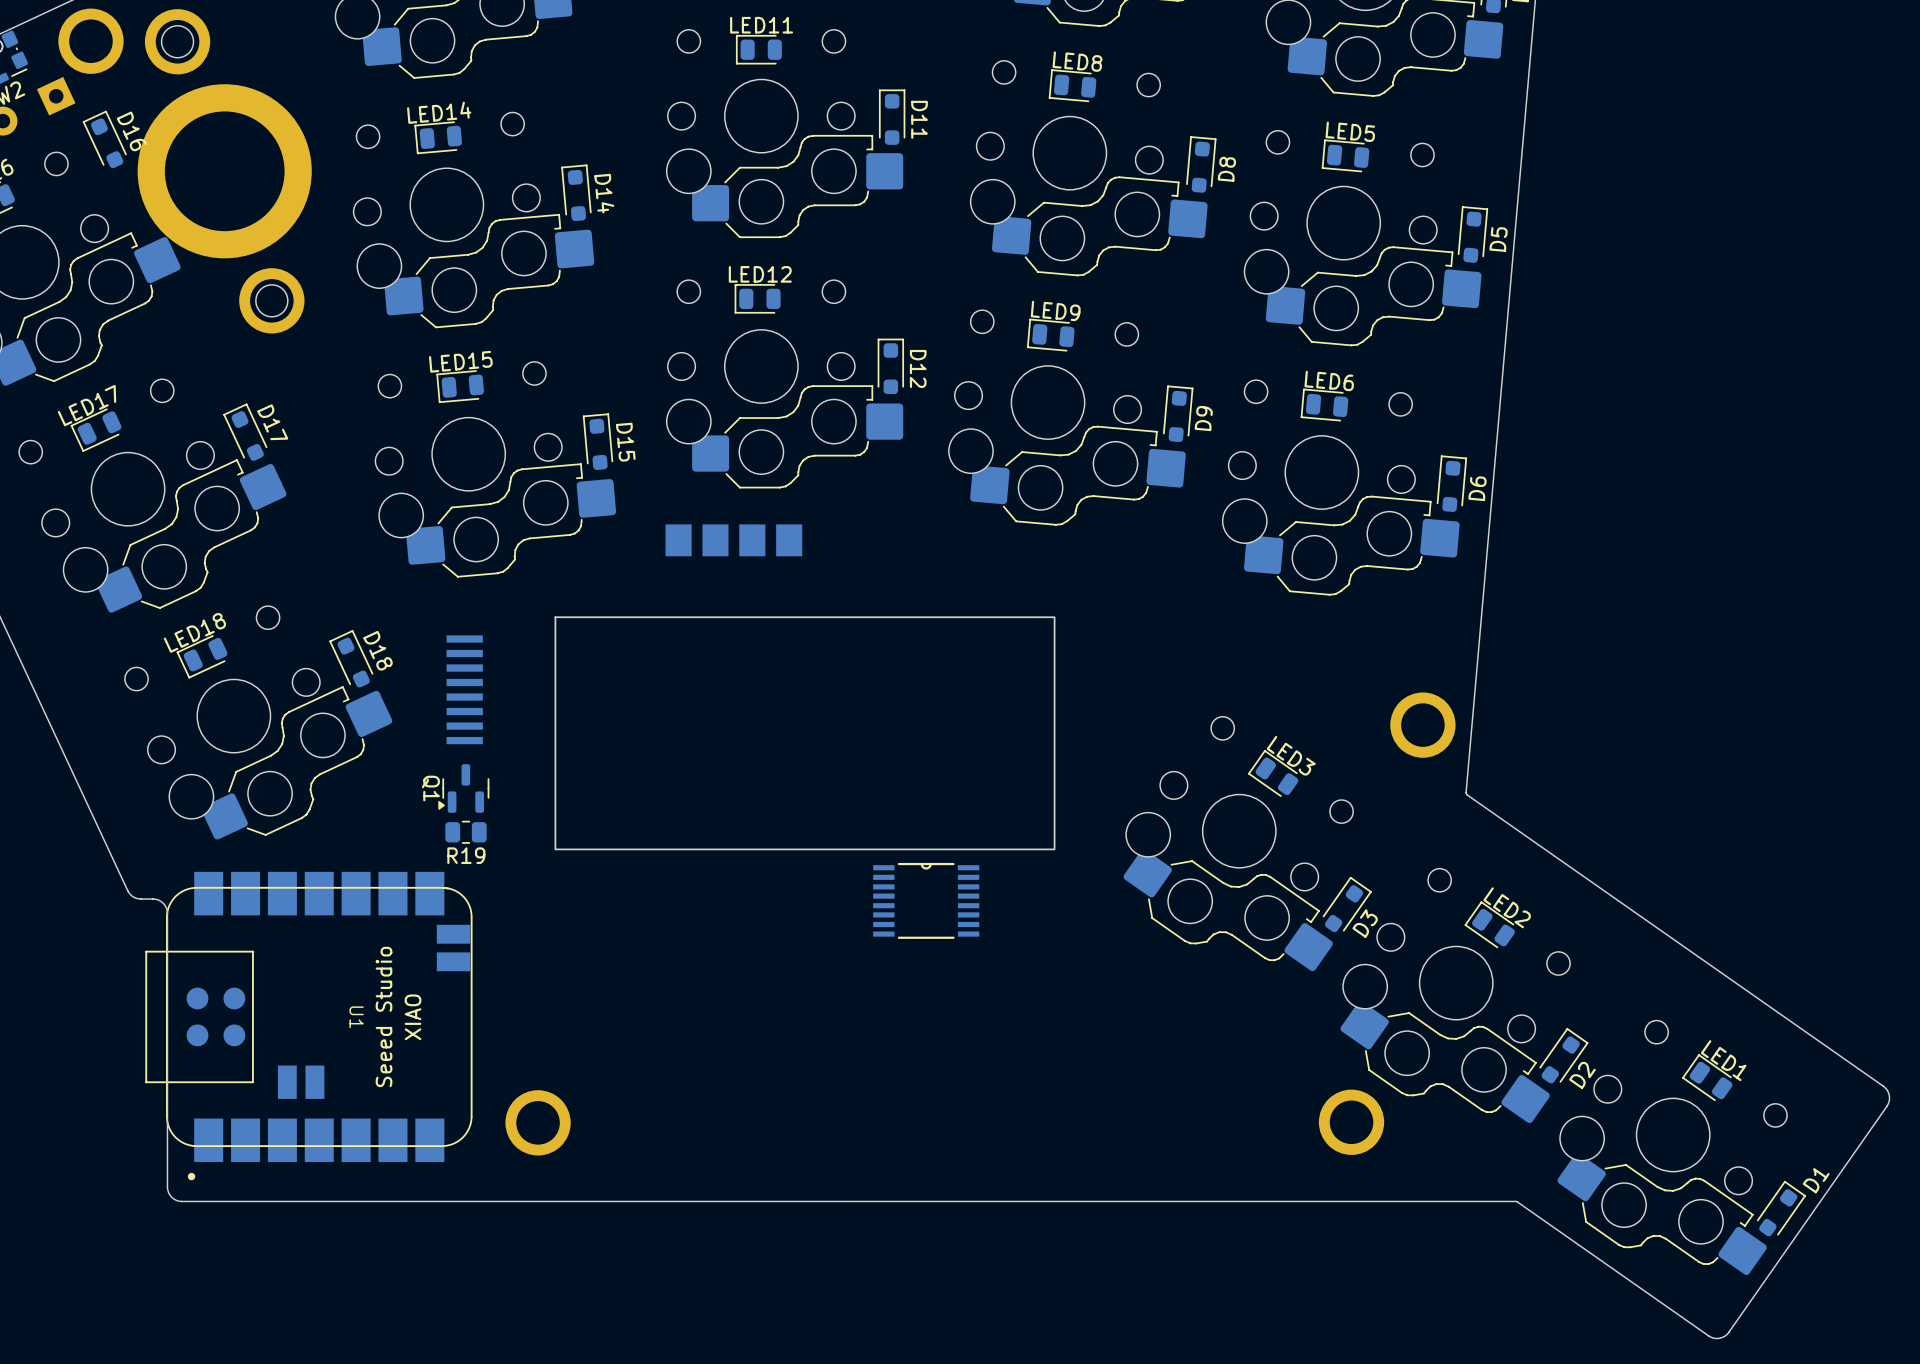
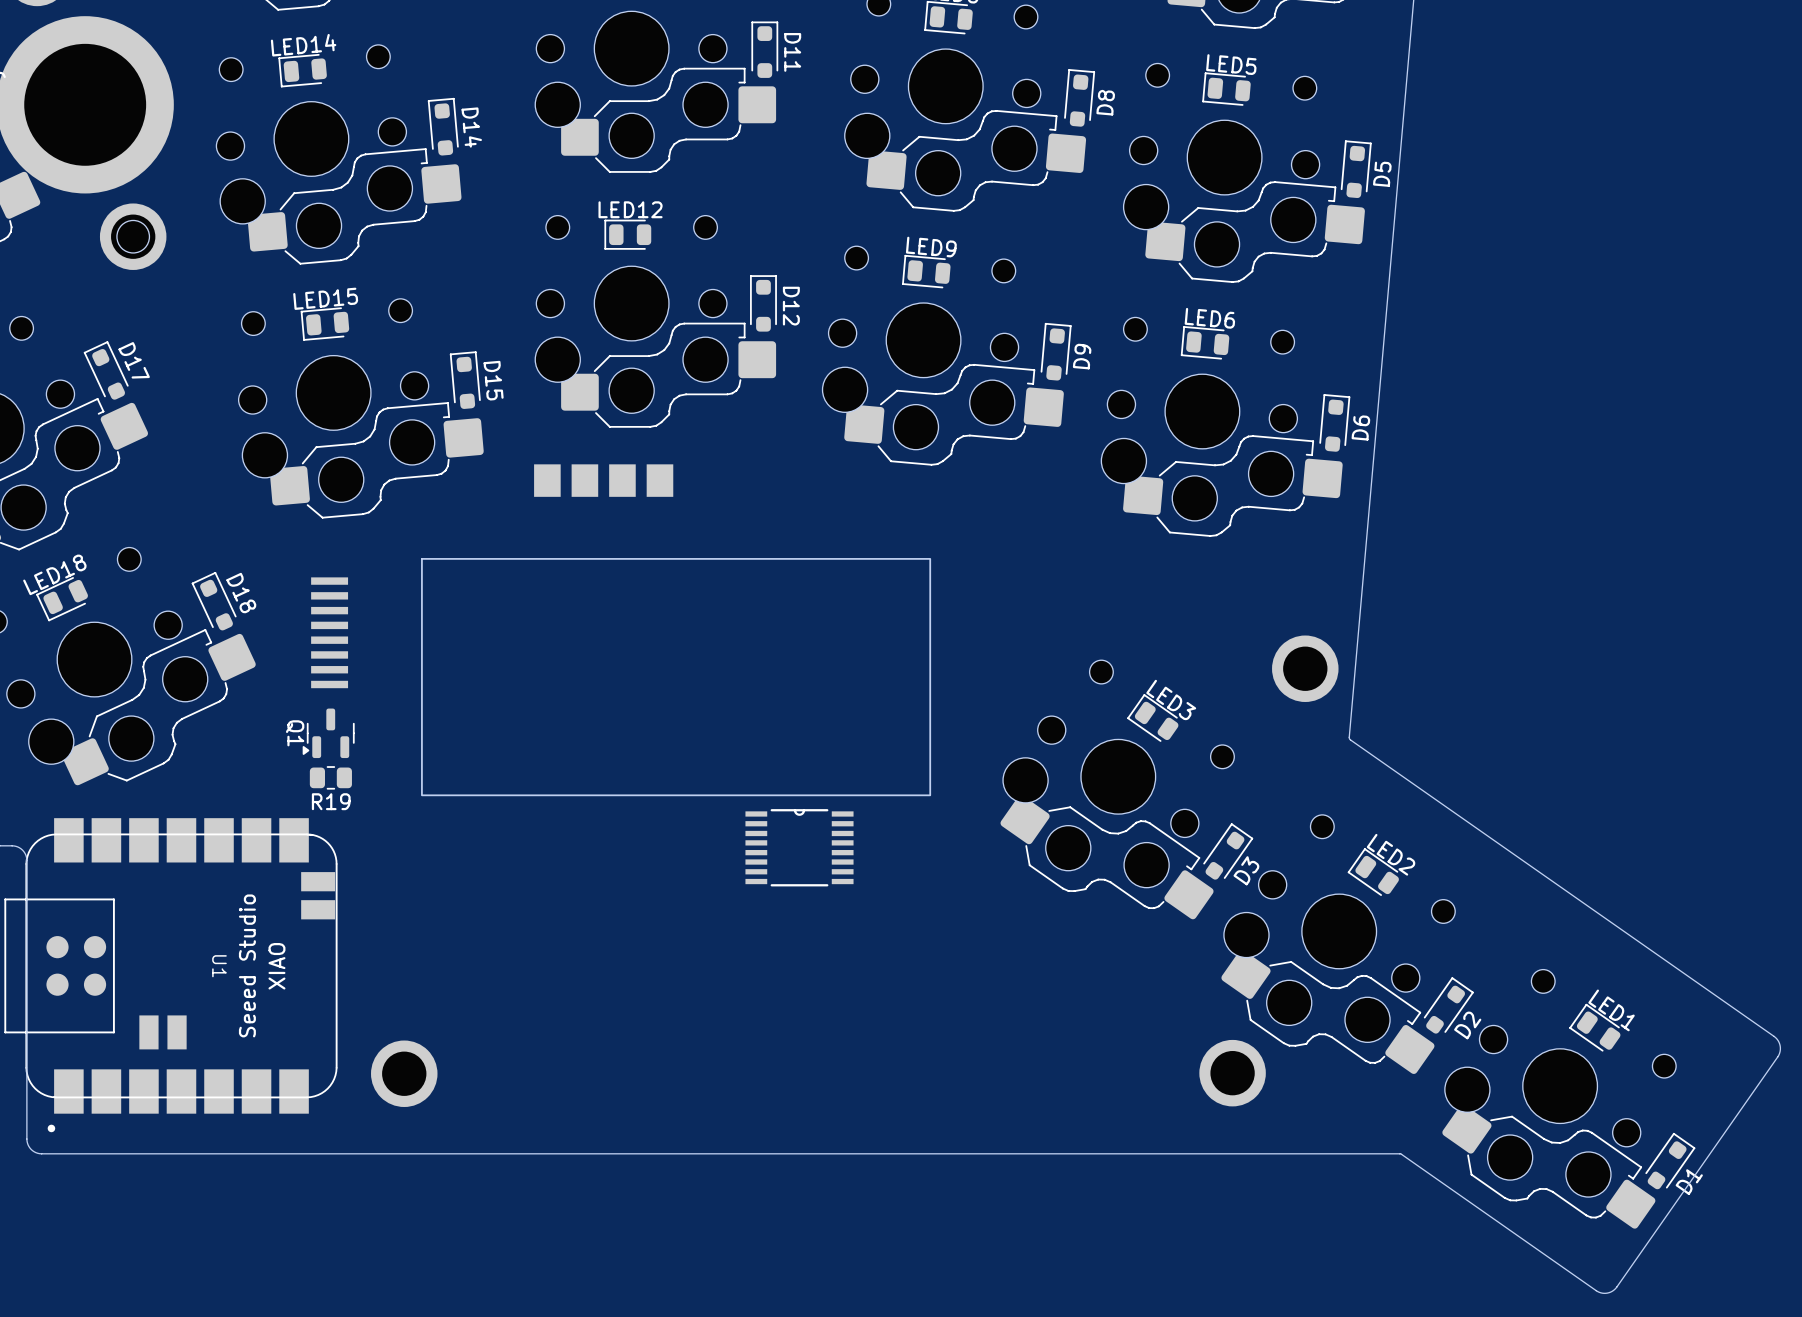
D1 name position: D1 (1816, 1180) -> D1 (1689, 1182)

